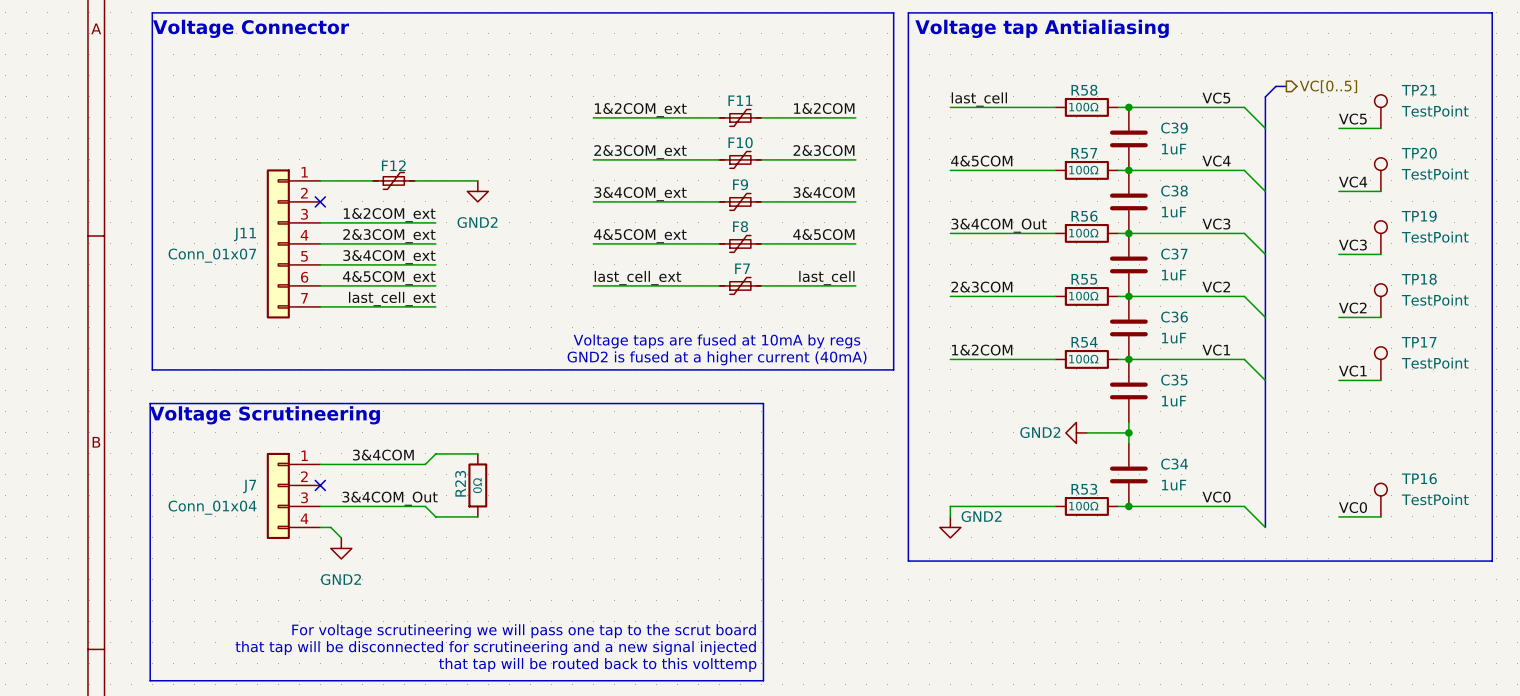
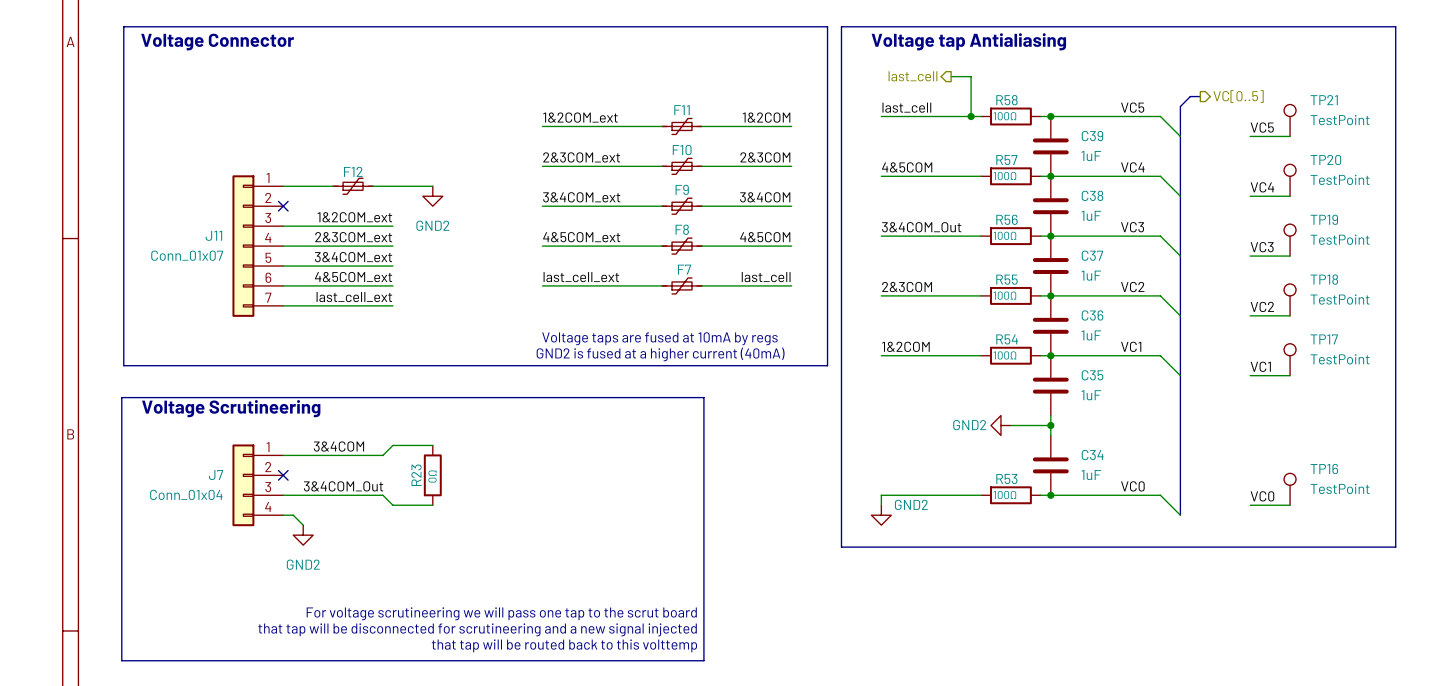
wire: none -> (951, 76) (971, 76) (971, 116)
hierarchical label: none -> last_cell (912, 76)
junction: none -> (971, 116)

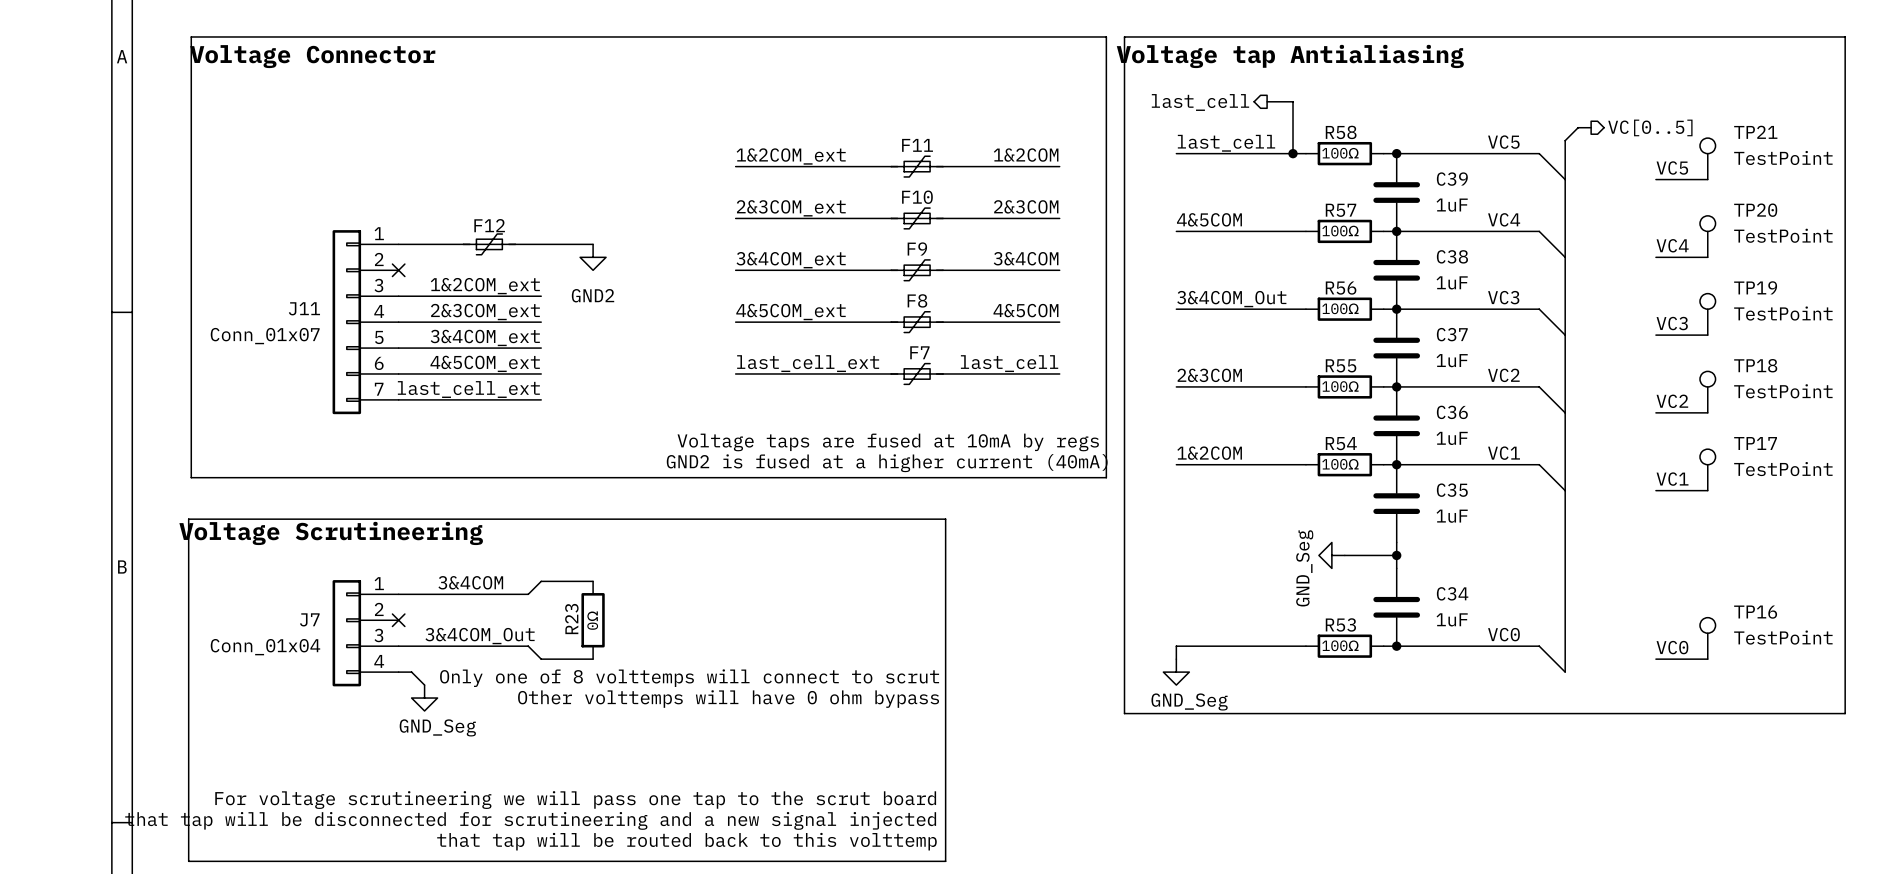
power symbol: GND2 (1000, 425) -> GND_Seg (1331, 555)
power symbol: GND2 (881, 515) -> GND_Seg (1176, 672)
text: none -> Only one of 8 volttemps will connect to scrut (689, 678)
power symbol: GND2 (303, 535) -> GND_Seg (424, 698)
text: none -> Other volttemps will have 0 ohm bypass (728, 699)

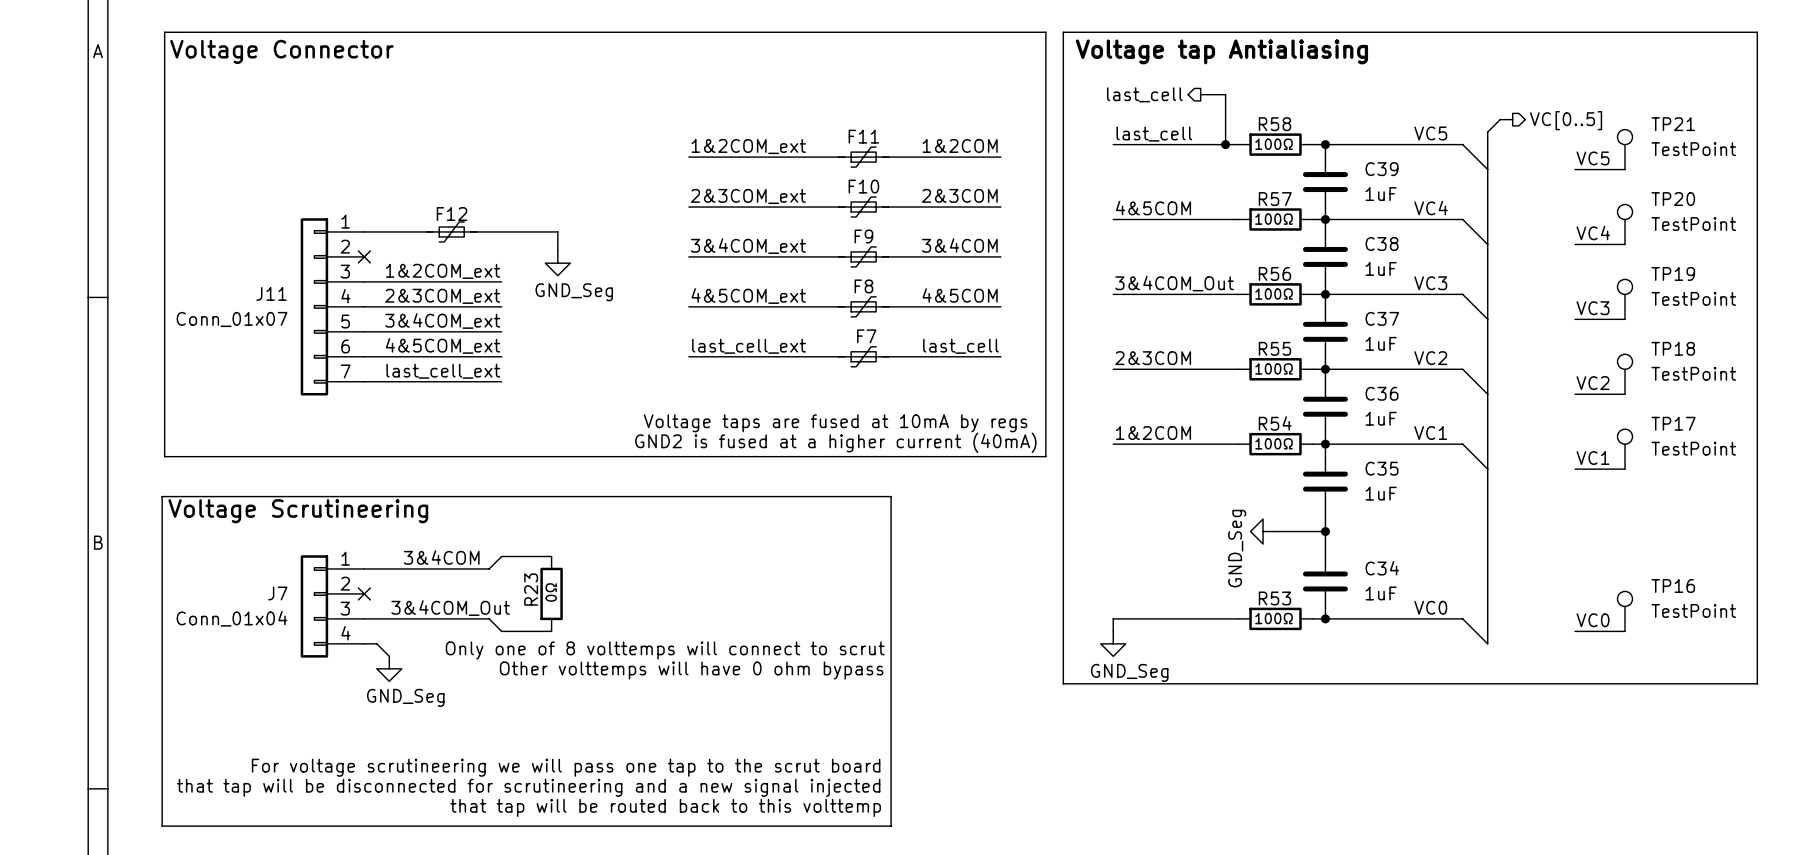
wire: none -> (551, 231) (557, 231) (557, 250)
power symbol: GND2 (593, 257) -> none
power symbol: none -> GND_Seg (557, 263)

